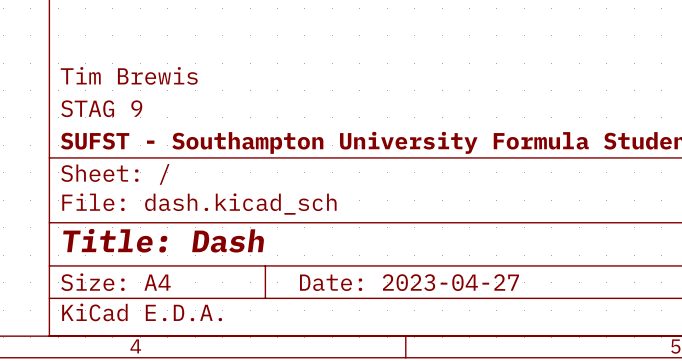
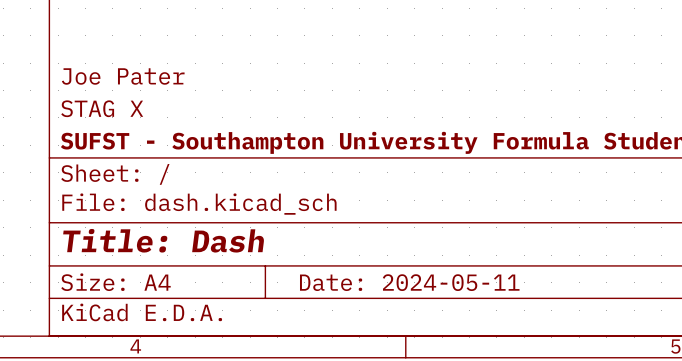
title block: Tim Brewis (129, 75) -> Joe Pater (123, 76)
title block: STAG 9 (101, 108) -> STAG X (102, 108)
title block: Date: 2023-04-27 (409, 282) -> Date: 2024-05-11 (409, 282)

